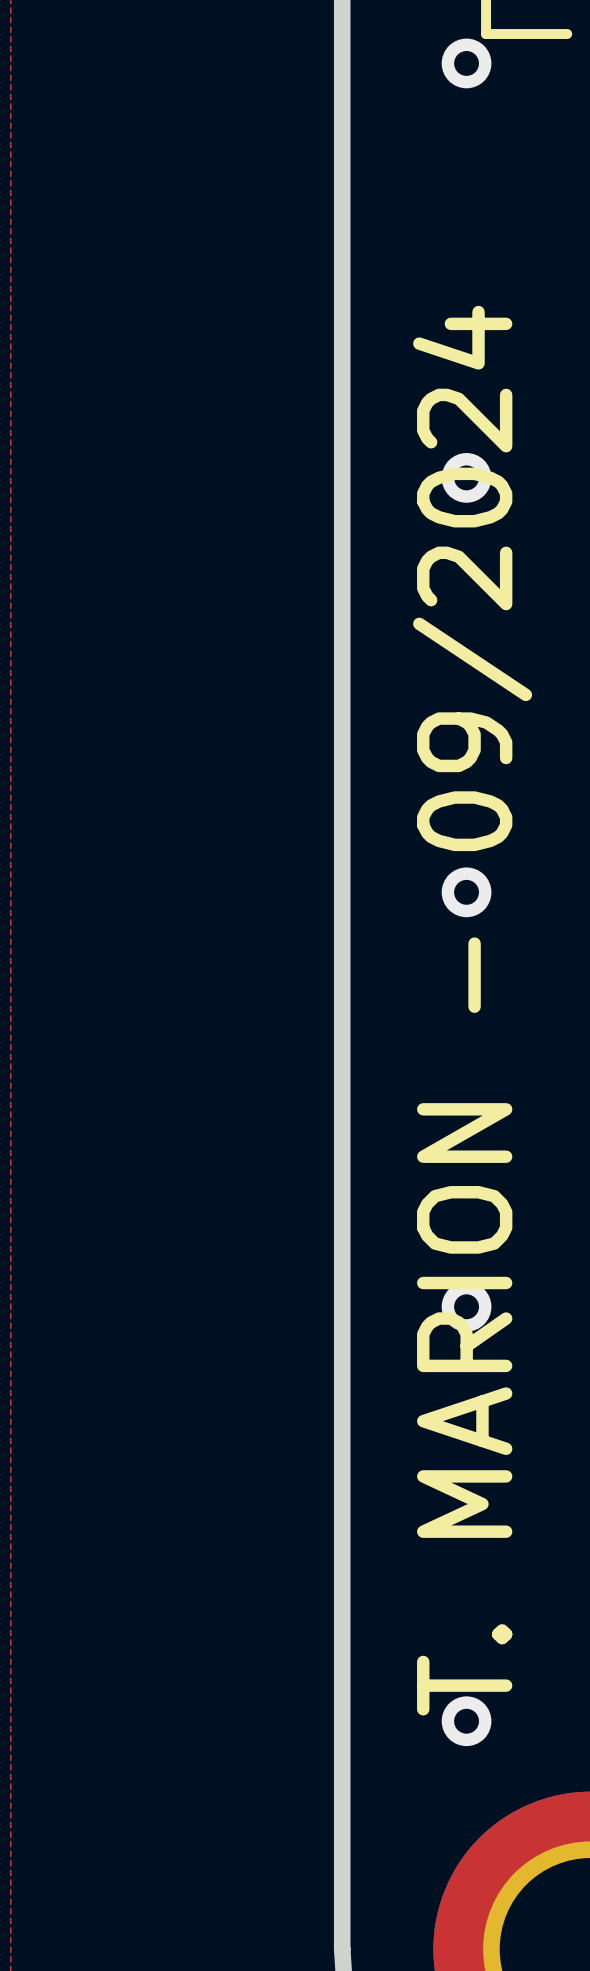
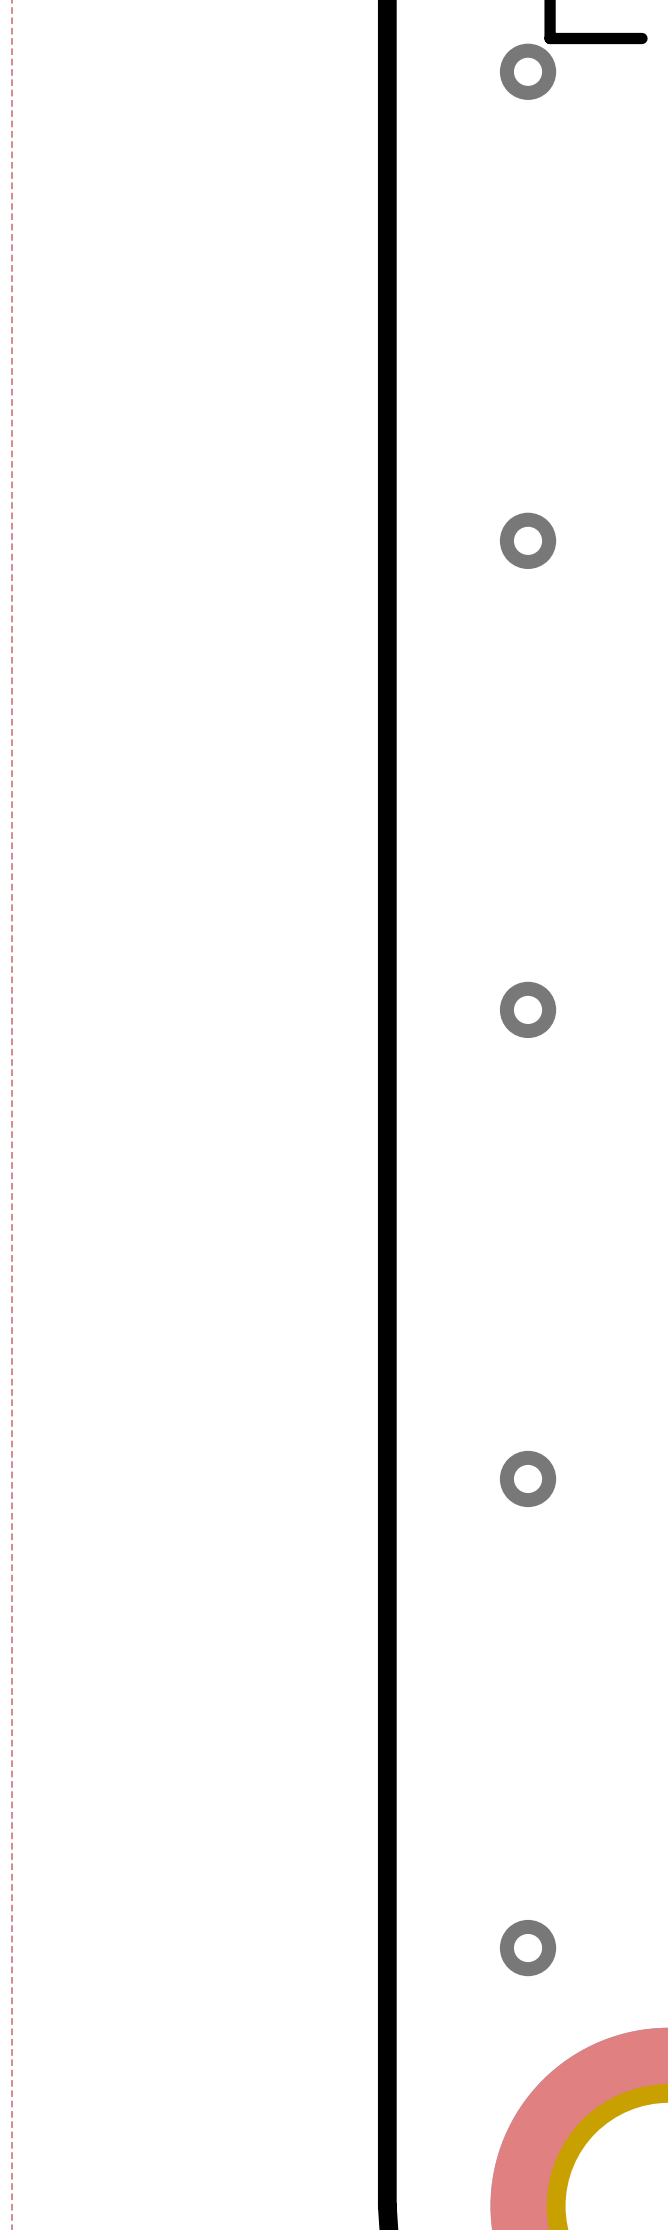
text: T. MARION - 09/2024 (472, 1010) -> none

